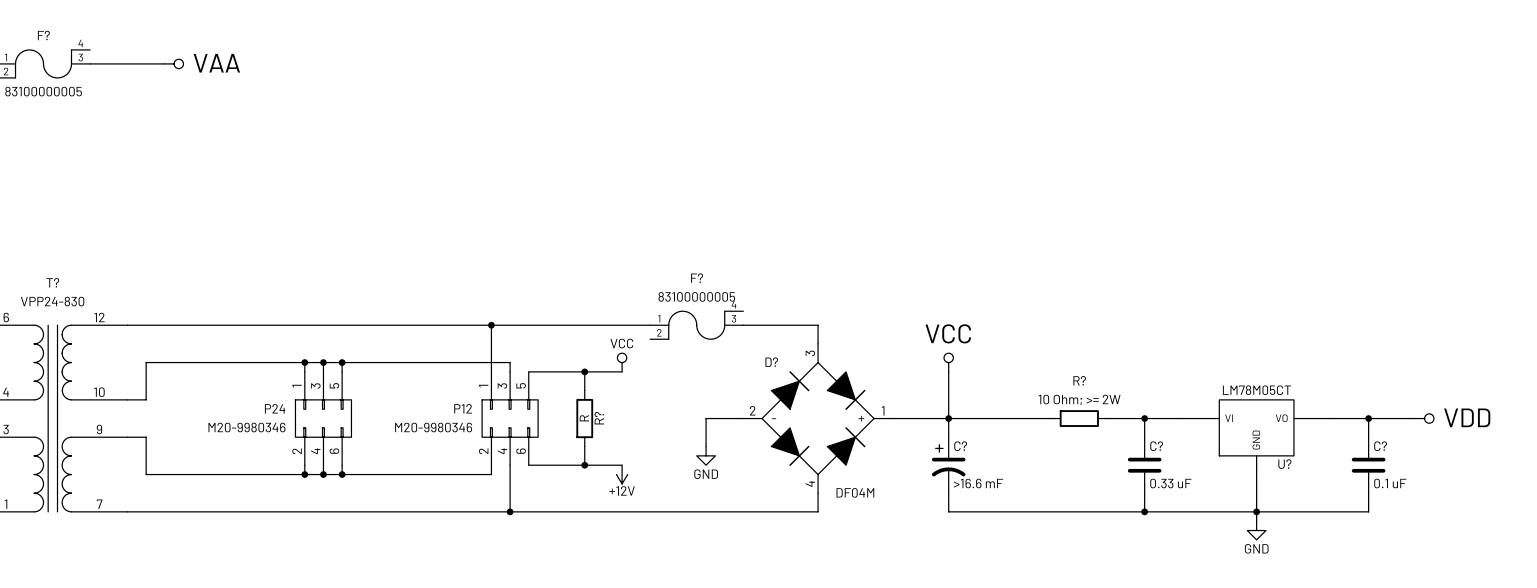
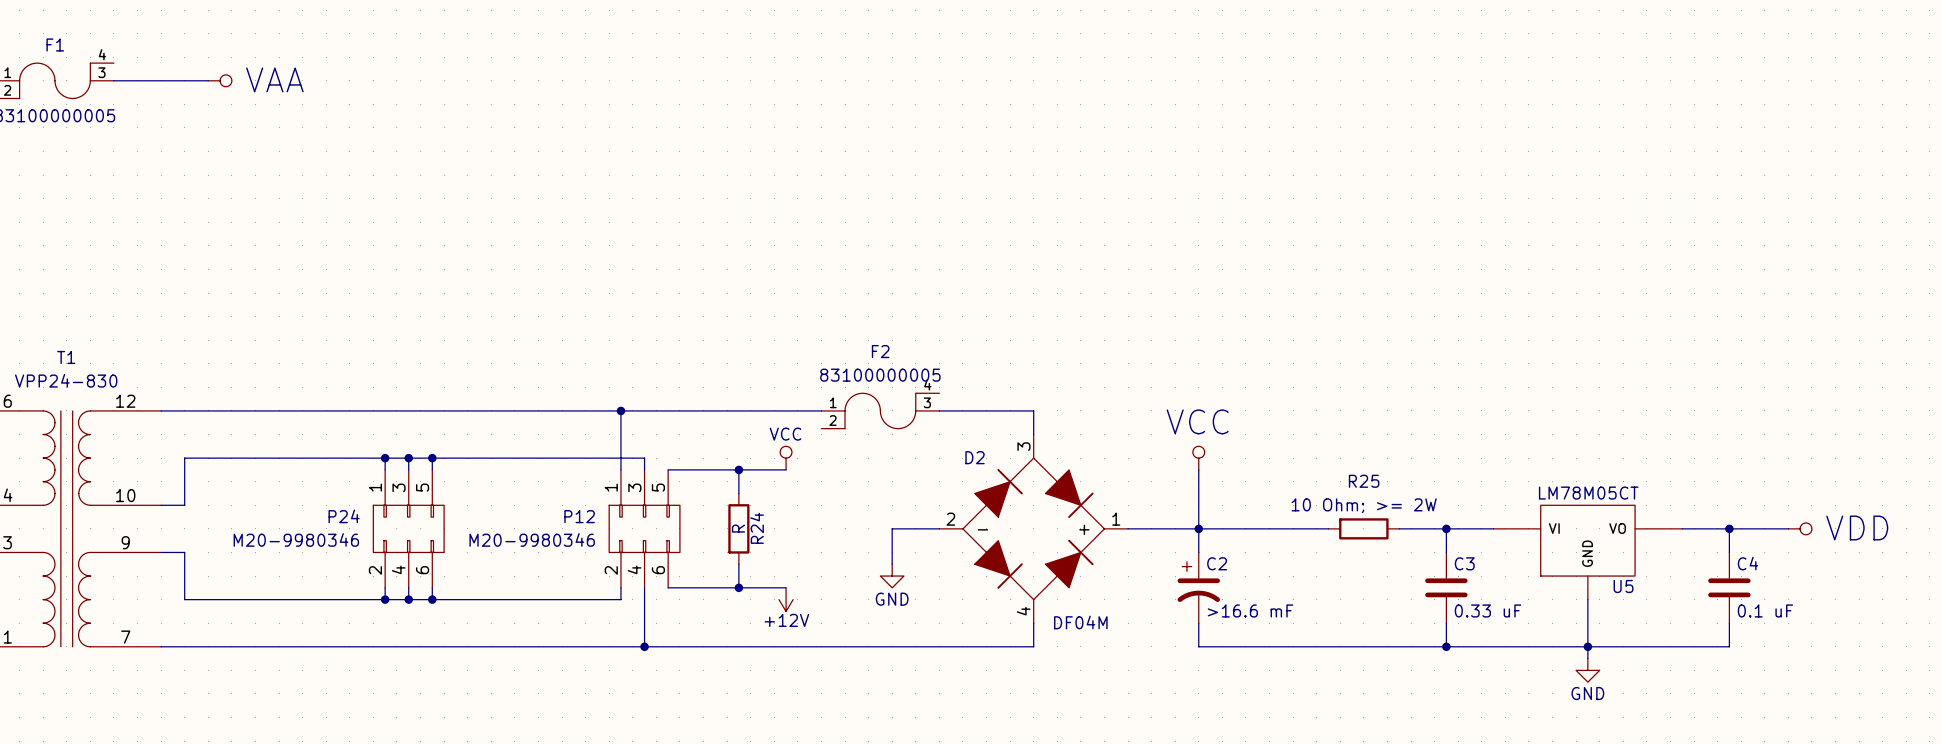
F? name: F? (43, 35) -> F1 (55, 44)
F? name: F? (697, 278) -> F2 (880, 351)
T? name: T? (52, 282) -> T1 (66, 357)
D? name: D? (771, 362) -> D2 (975, 457)
R? name: R? (1079, 380) -> R25 (1364, 481)
R? name: R? (599, 418) -> R24 (757, 528)
C? name: C? (960, 446) -> C2 (1217, 563)
C? name: C? (1156, 446) -> C3 (1464, 563)
C? name: C? (1380, 446) -> C4 (1748, 563)
U? name: U? (1284, 464) -> U5 (1623, 586)

